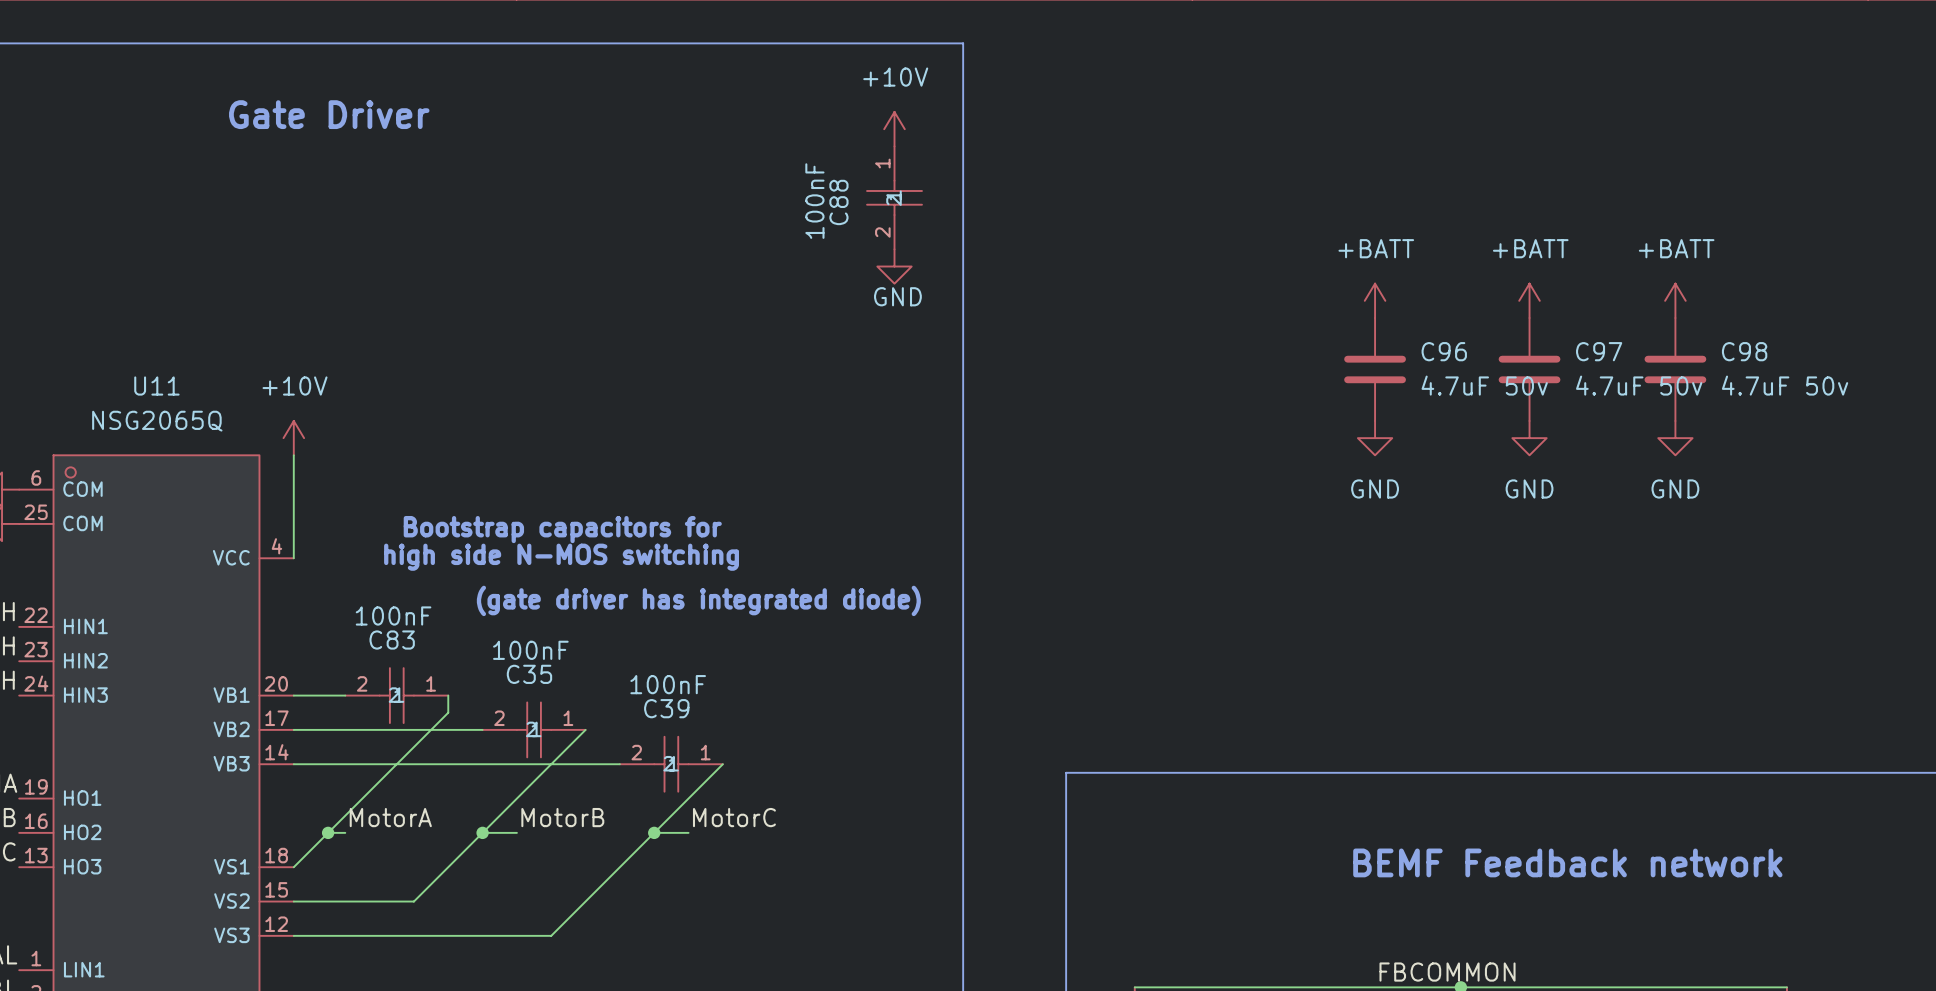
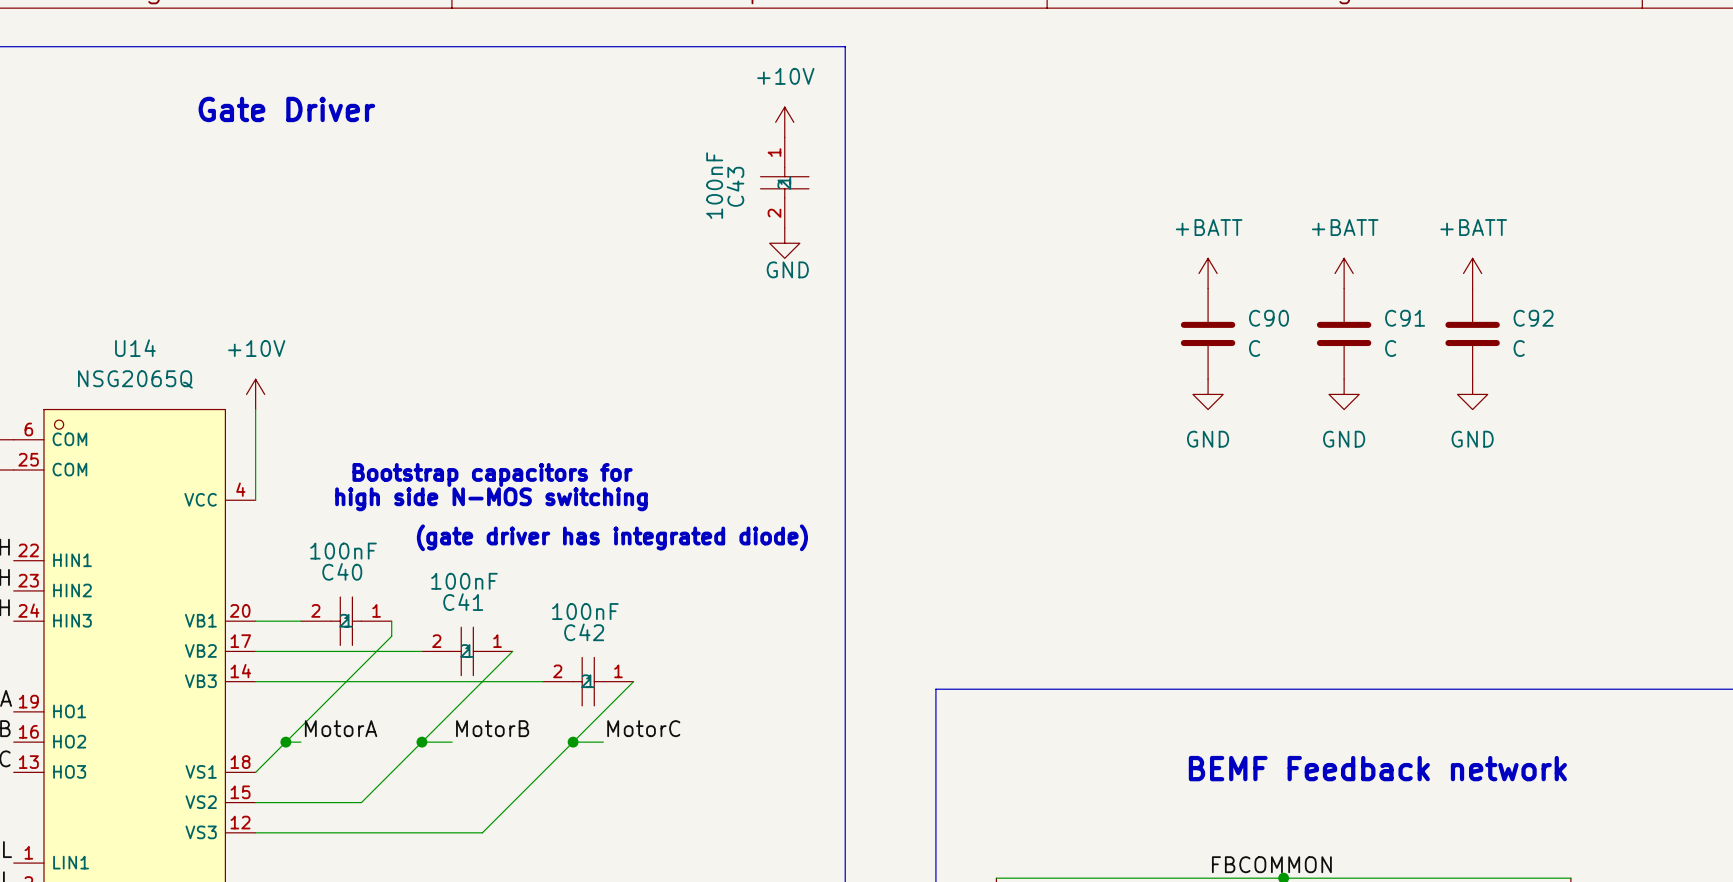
C88 name: C88 (838, 202) -> C43 (735, 186)
C96 name: C96 (1444, 351) -> C90 (1269, 318)
C97 name: C97 (1599, 351) -> C91 (1405, 318)
C98 name: C98 (1744, 351) -> C92 (1533, 318)
C96 value: 4.7uF 50v (1484, 385) -> C (1254, 348)
C97 value: 4.7uF 50v (1639, 385) -> C (1390, 348)
C98 value: 4.7uF 50v (1785, 385) -> C (1519, 348)
U11 name: U11 (156, 386) -> U14 (135, 348)
C83 name: C83 (392, 640) -> C40 (342, 571)
C35 name: C35 (529, 674) -> C41 (463, 602)
C39 name: C39 (666, 708) -> C42 (584, 632)

